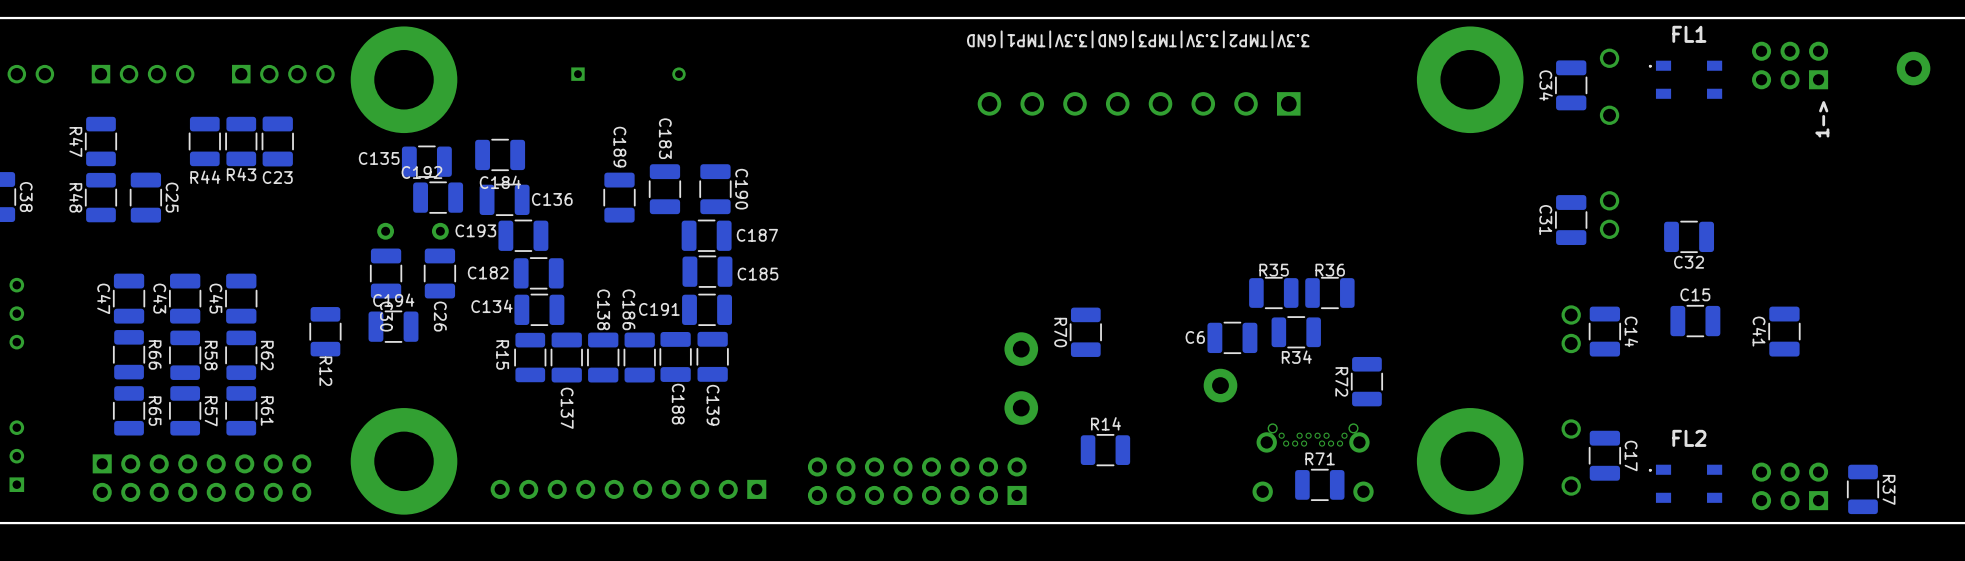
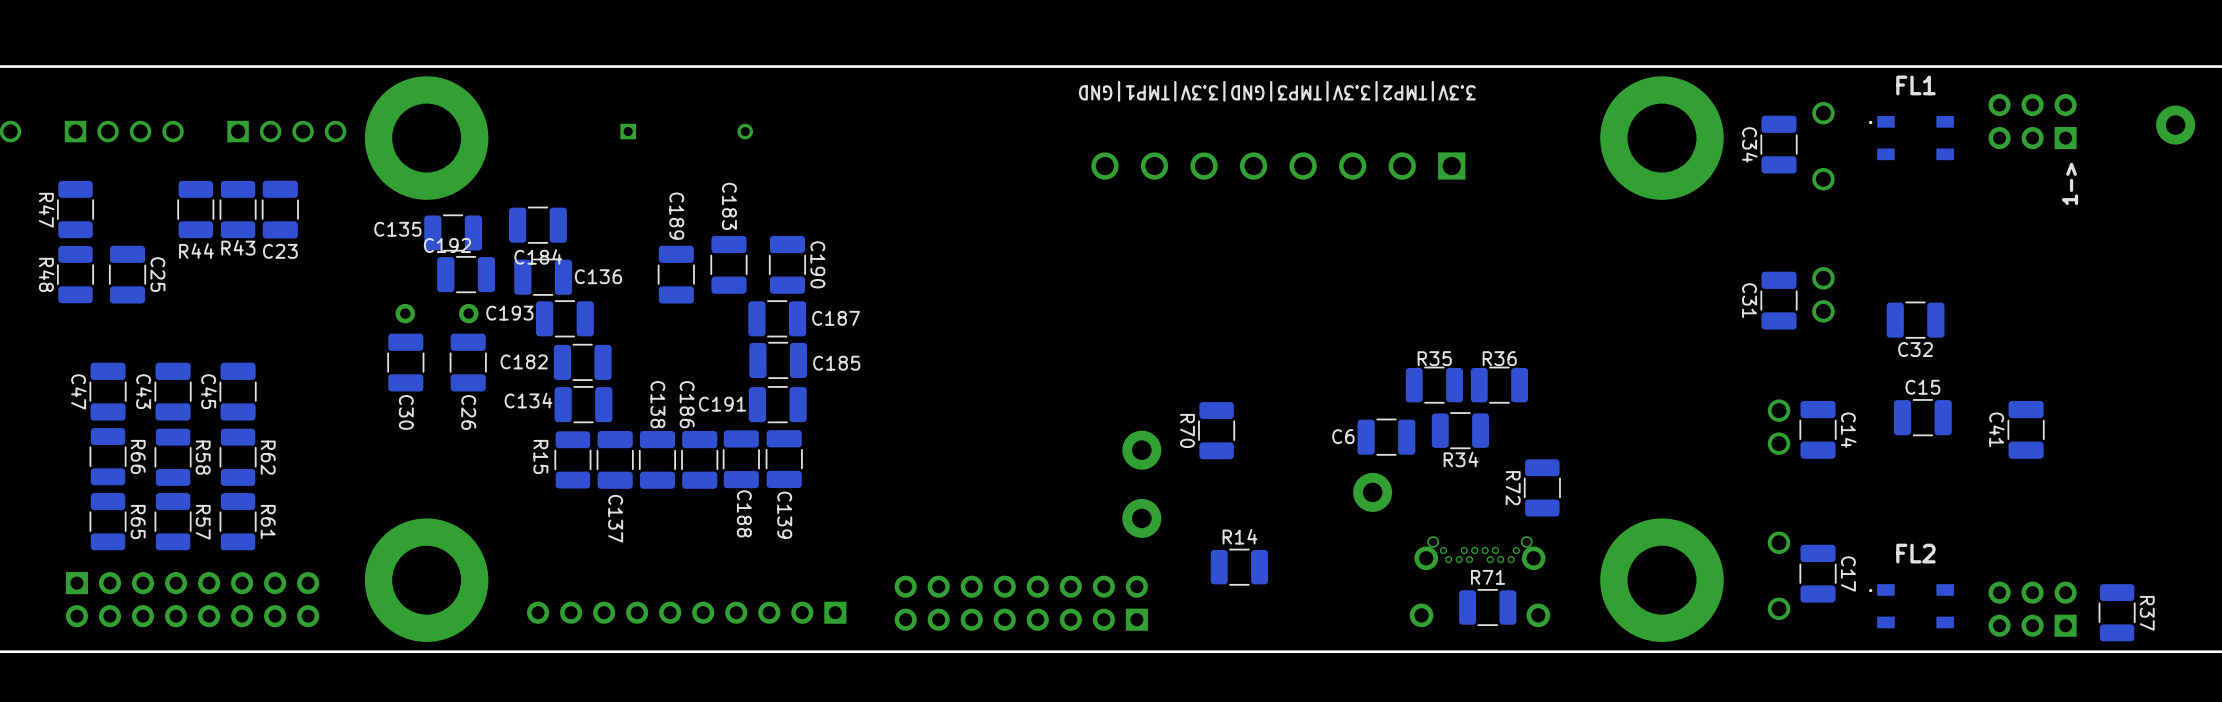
C194: (393, 326) -> none
R12: (325, 331) -> none

